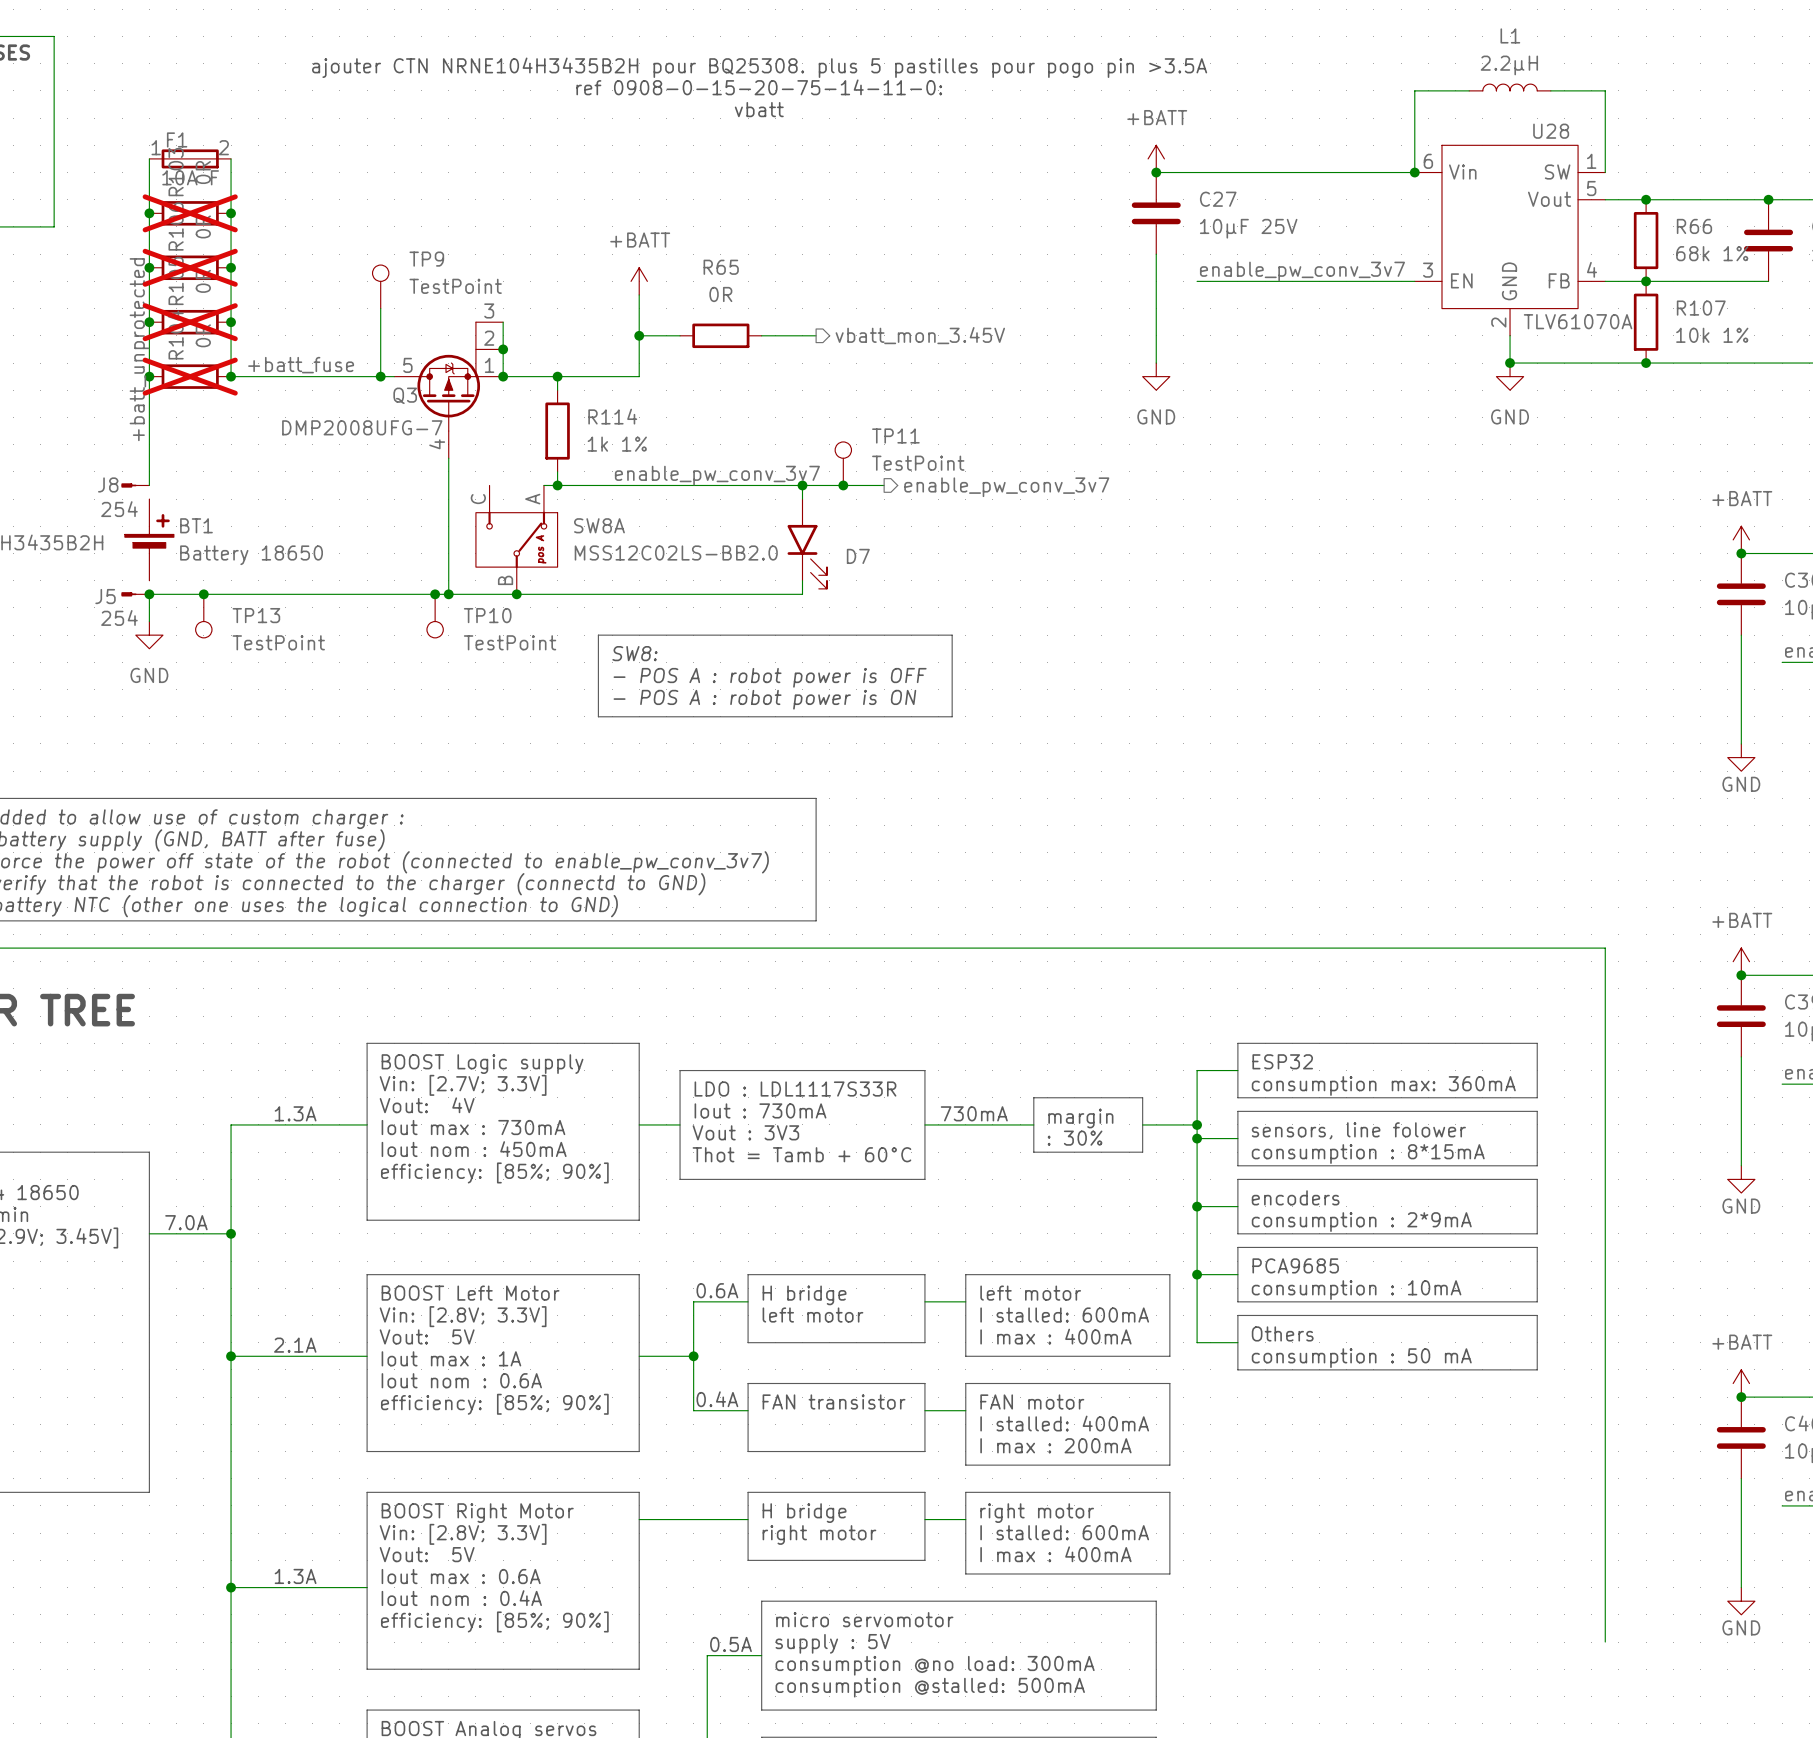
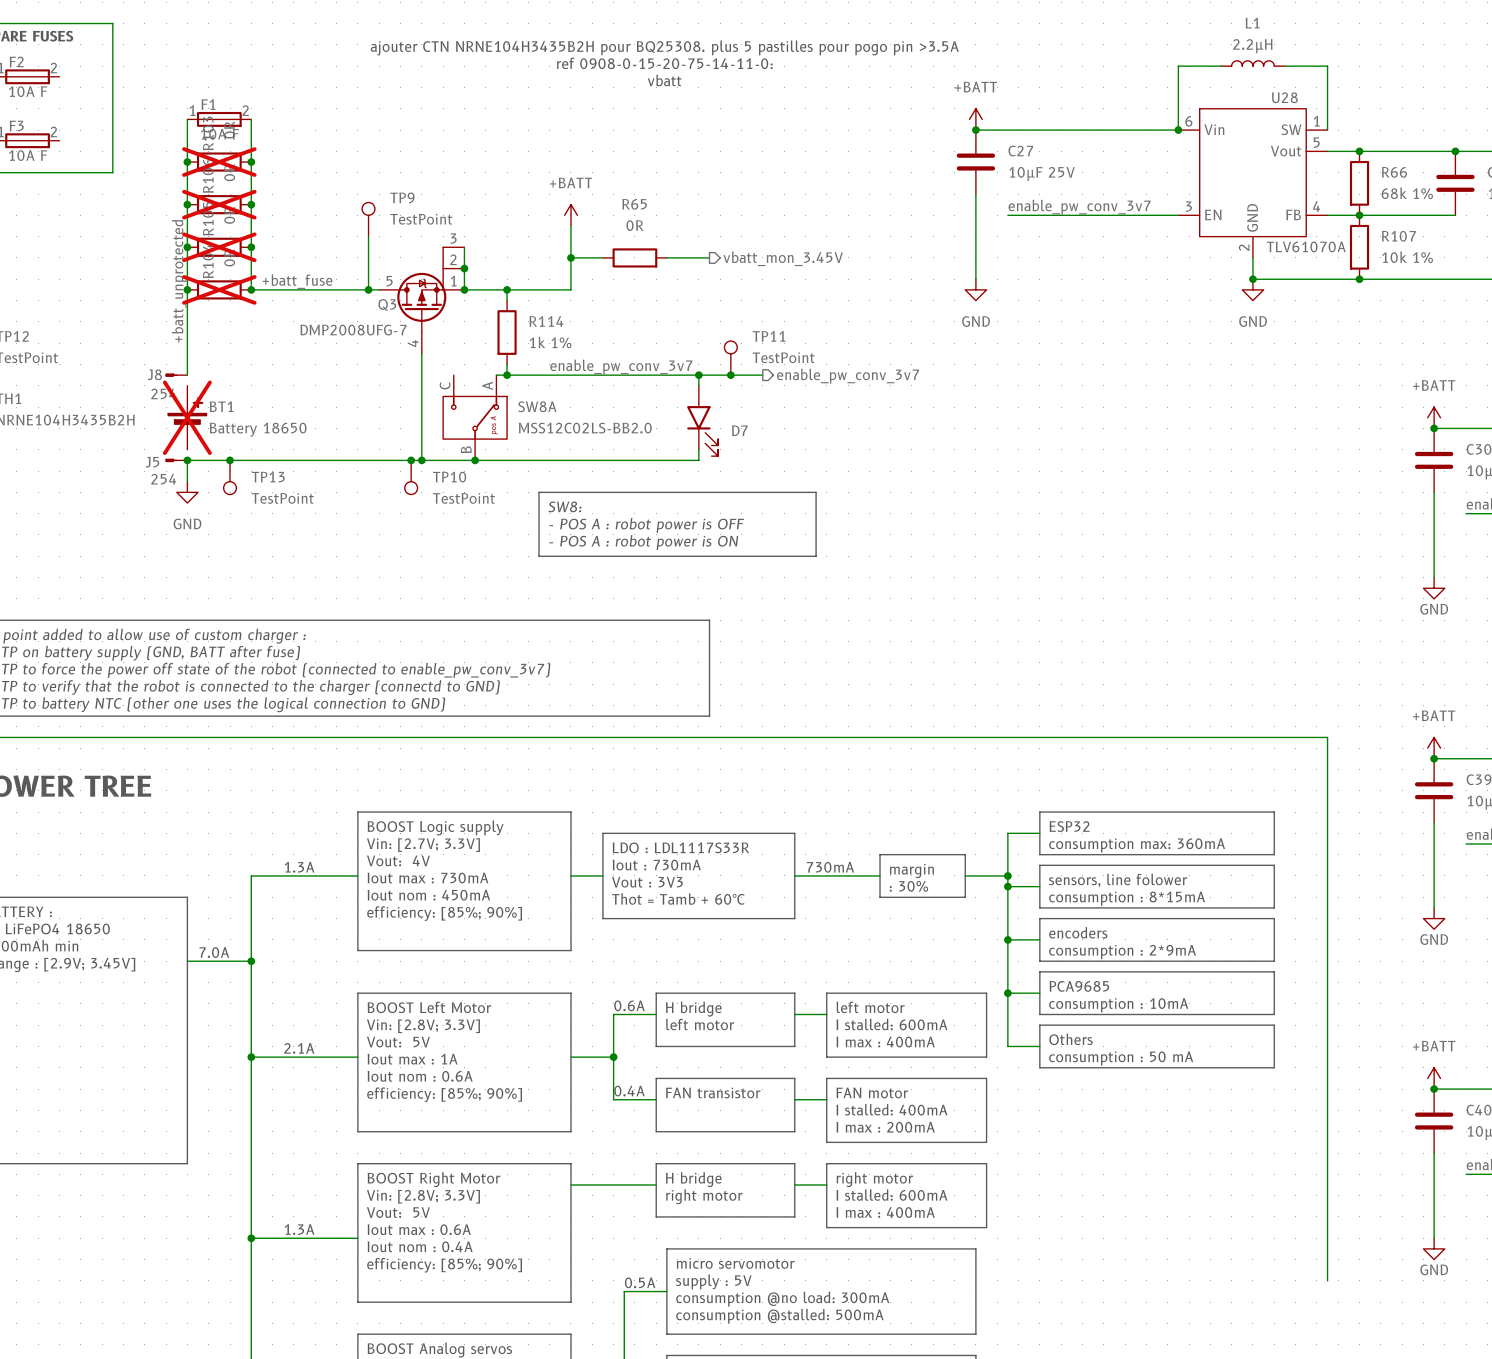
BT1 do-not-place cross: none -> (187, 417)

